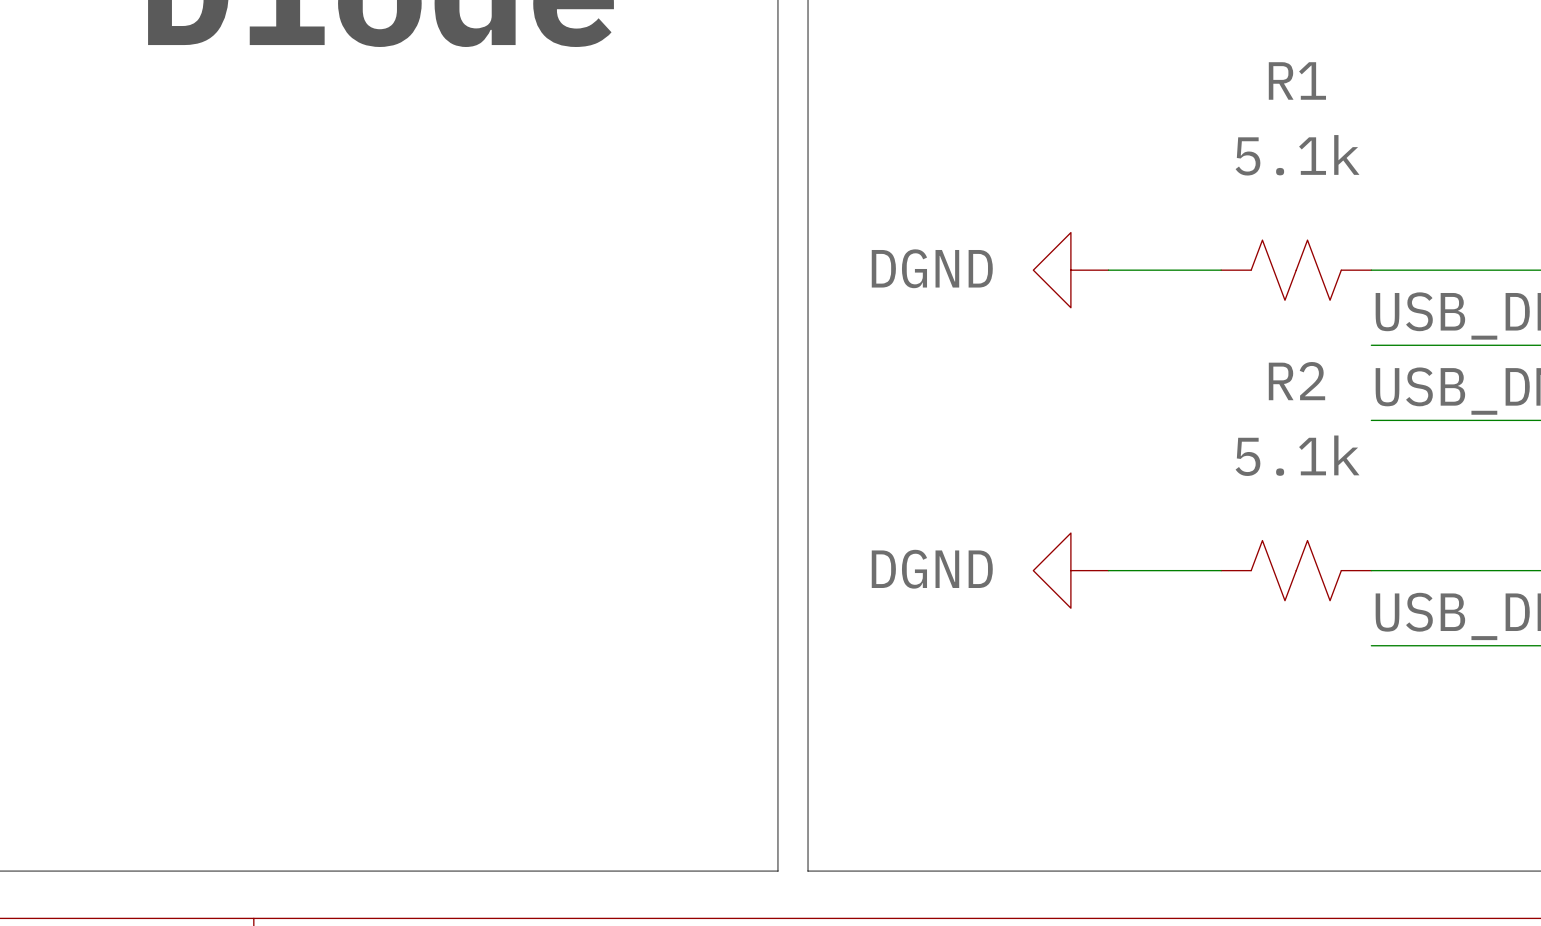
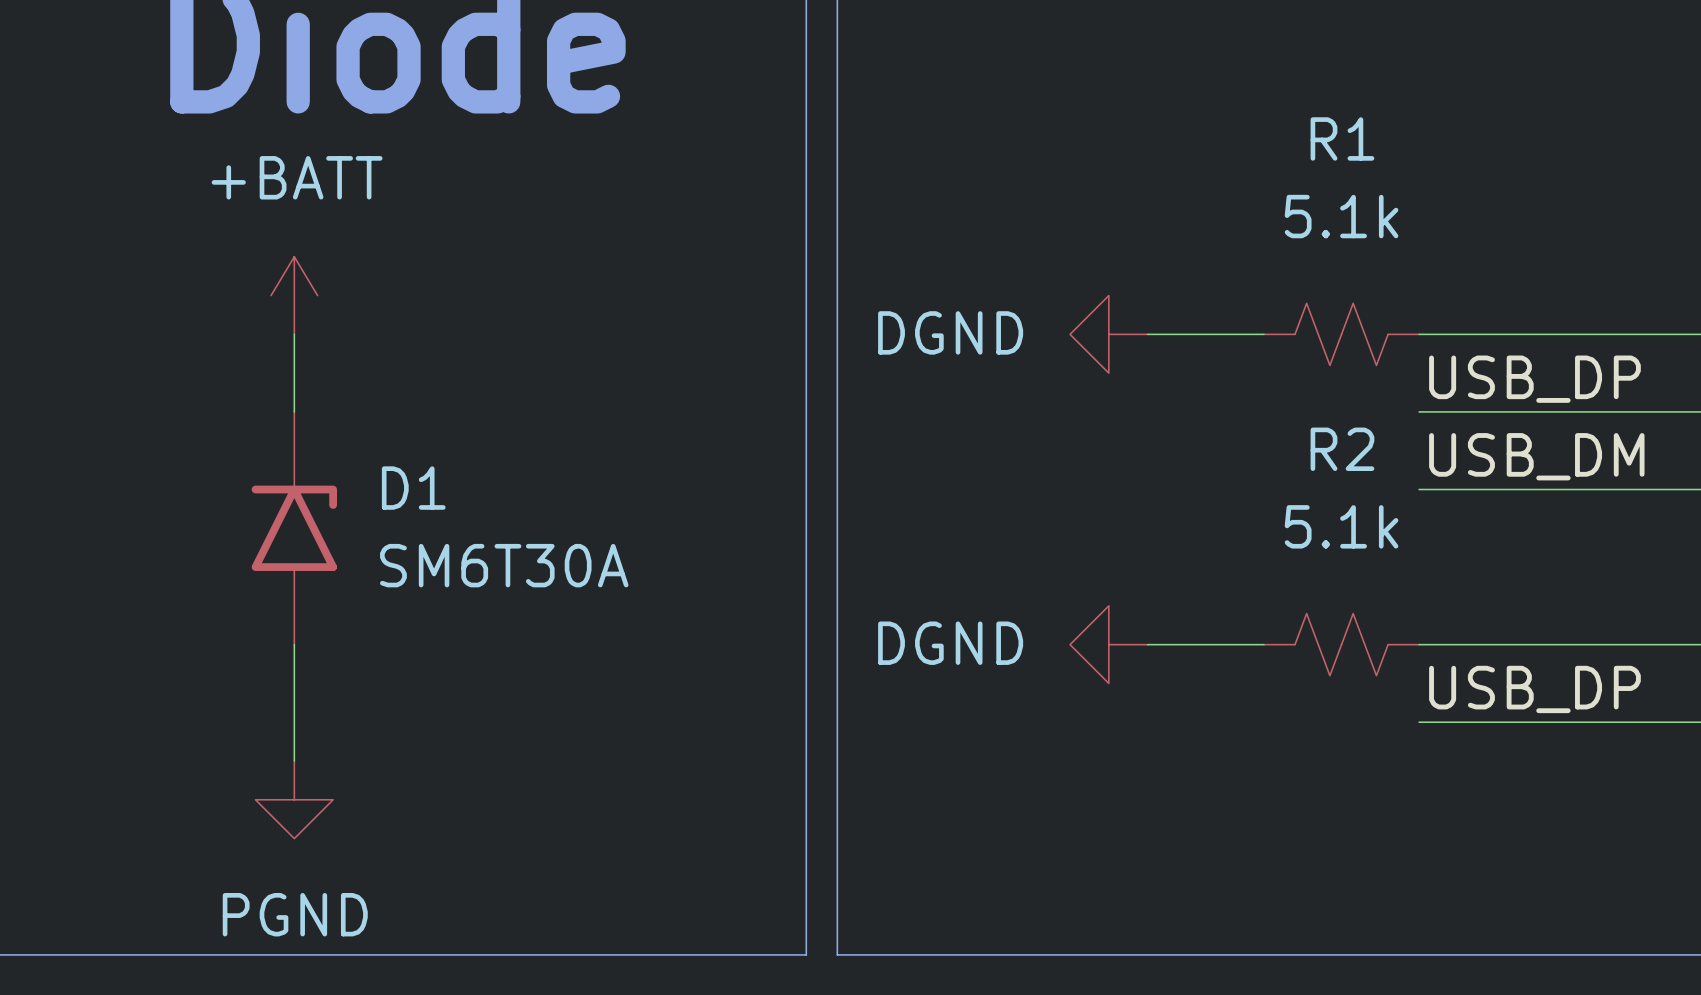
power symbol: none -> +BATT (294, 295)
wire: none -> (294, 334) (294, 411)
D1: none -> SM6T30A (294, 528)
wire: none -> (294, 644) (294, 761)
power symbol: none -> PGND (294, 799)

